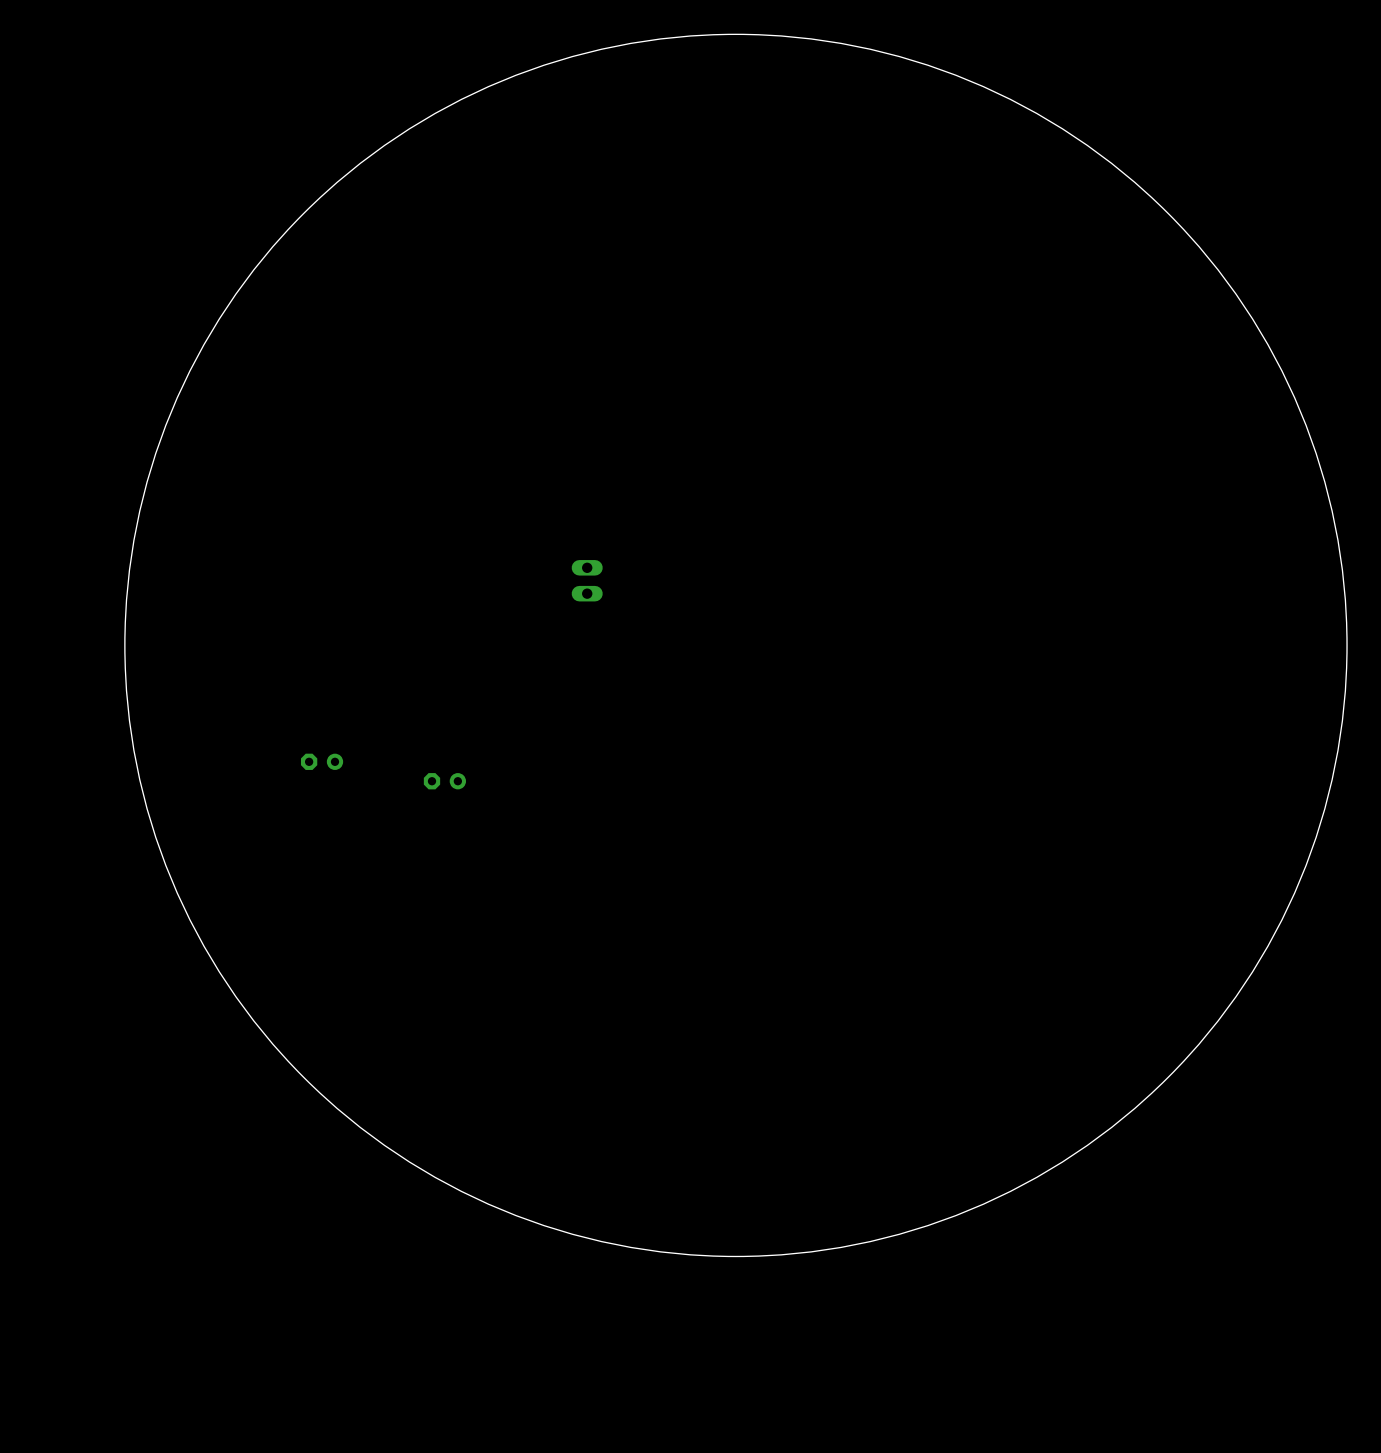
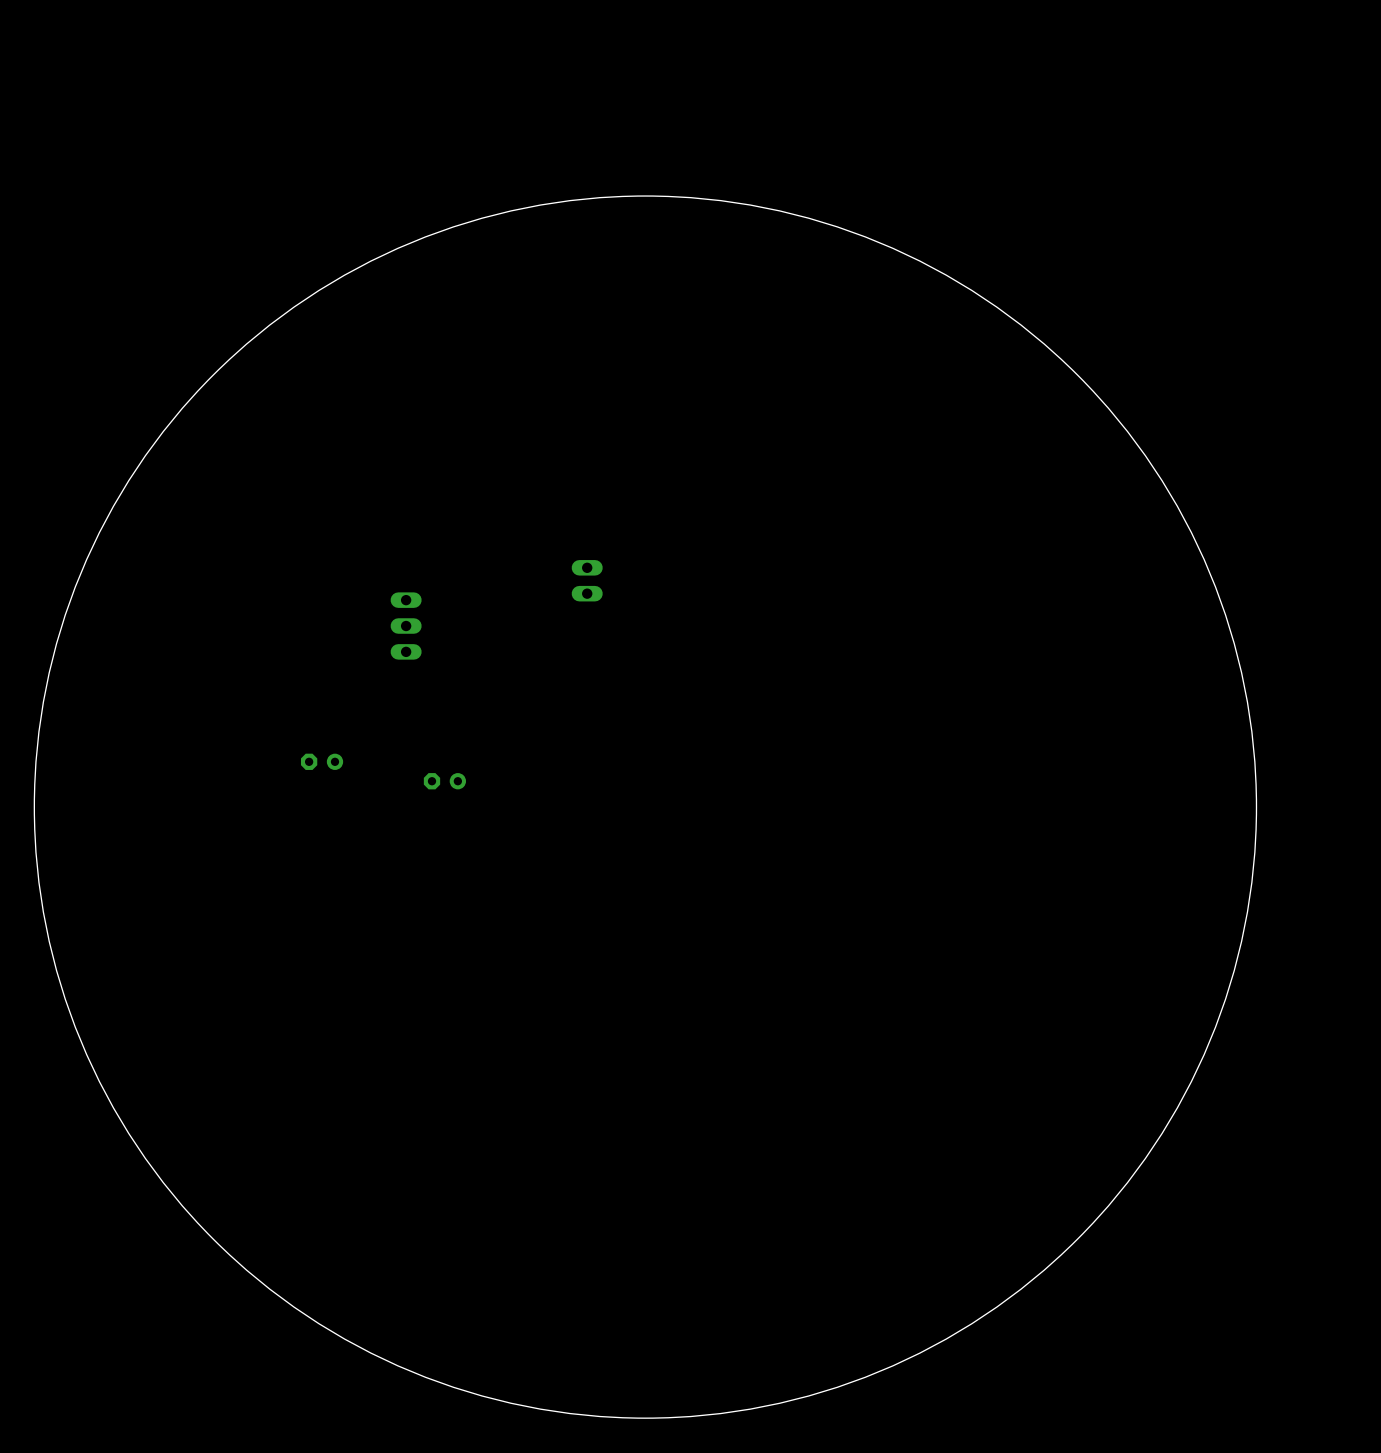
part: none -> (406, 626)
drawing position: (735, 645) -> (645, 807)

